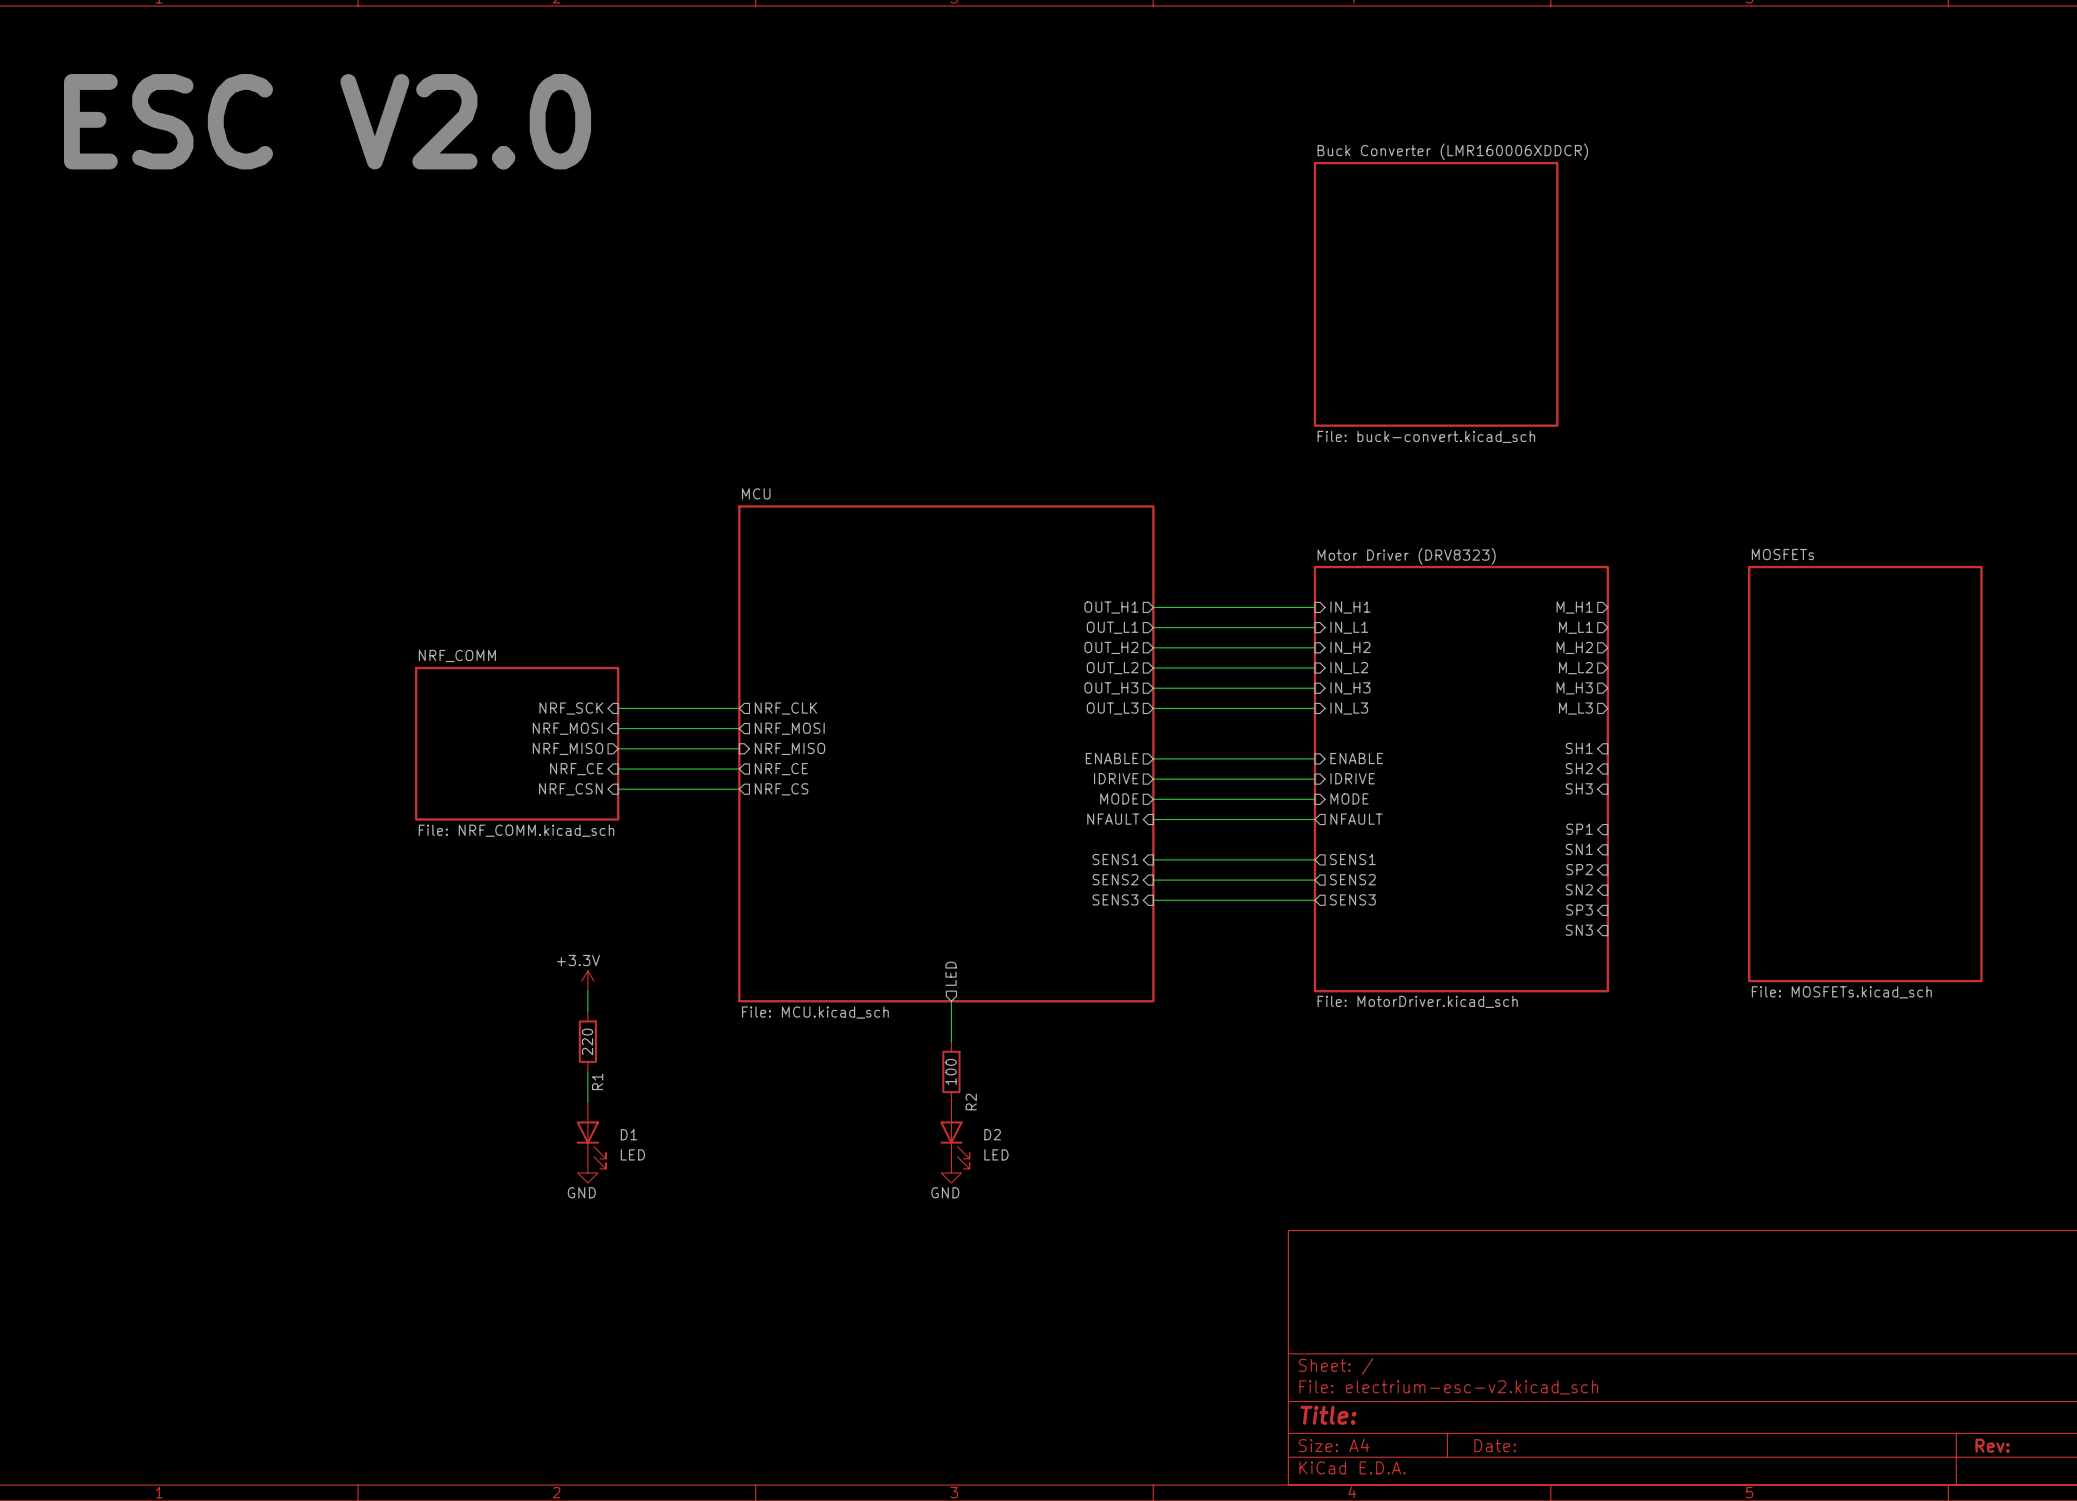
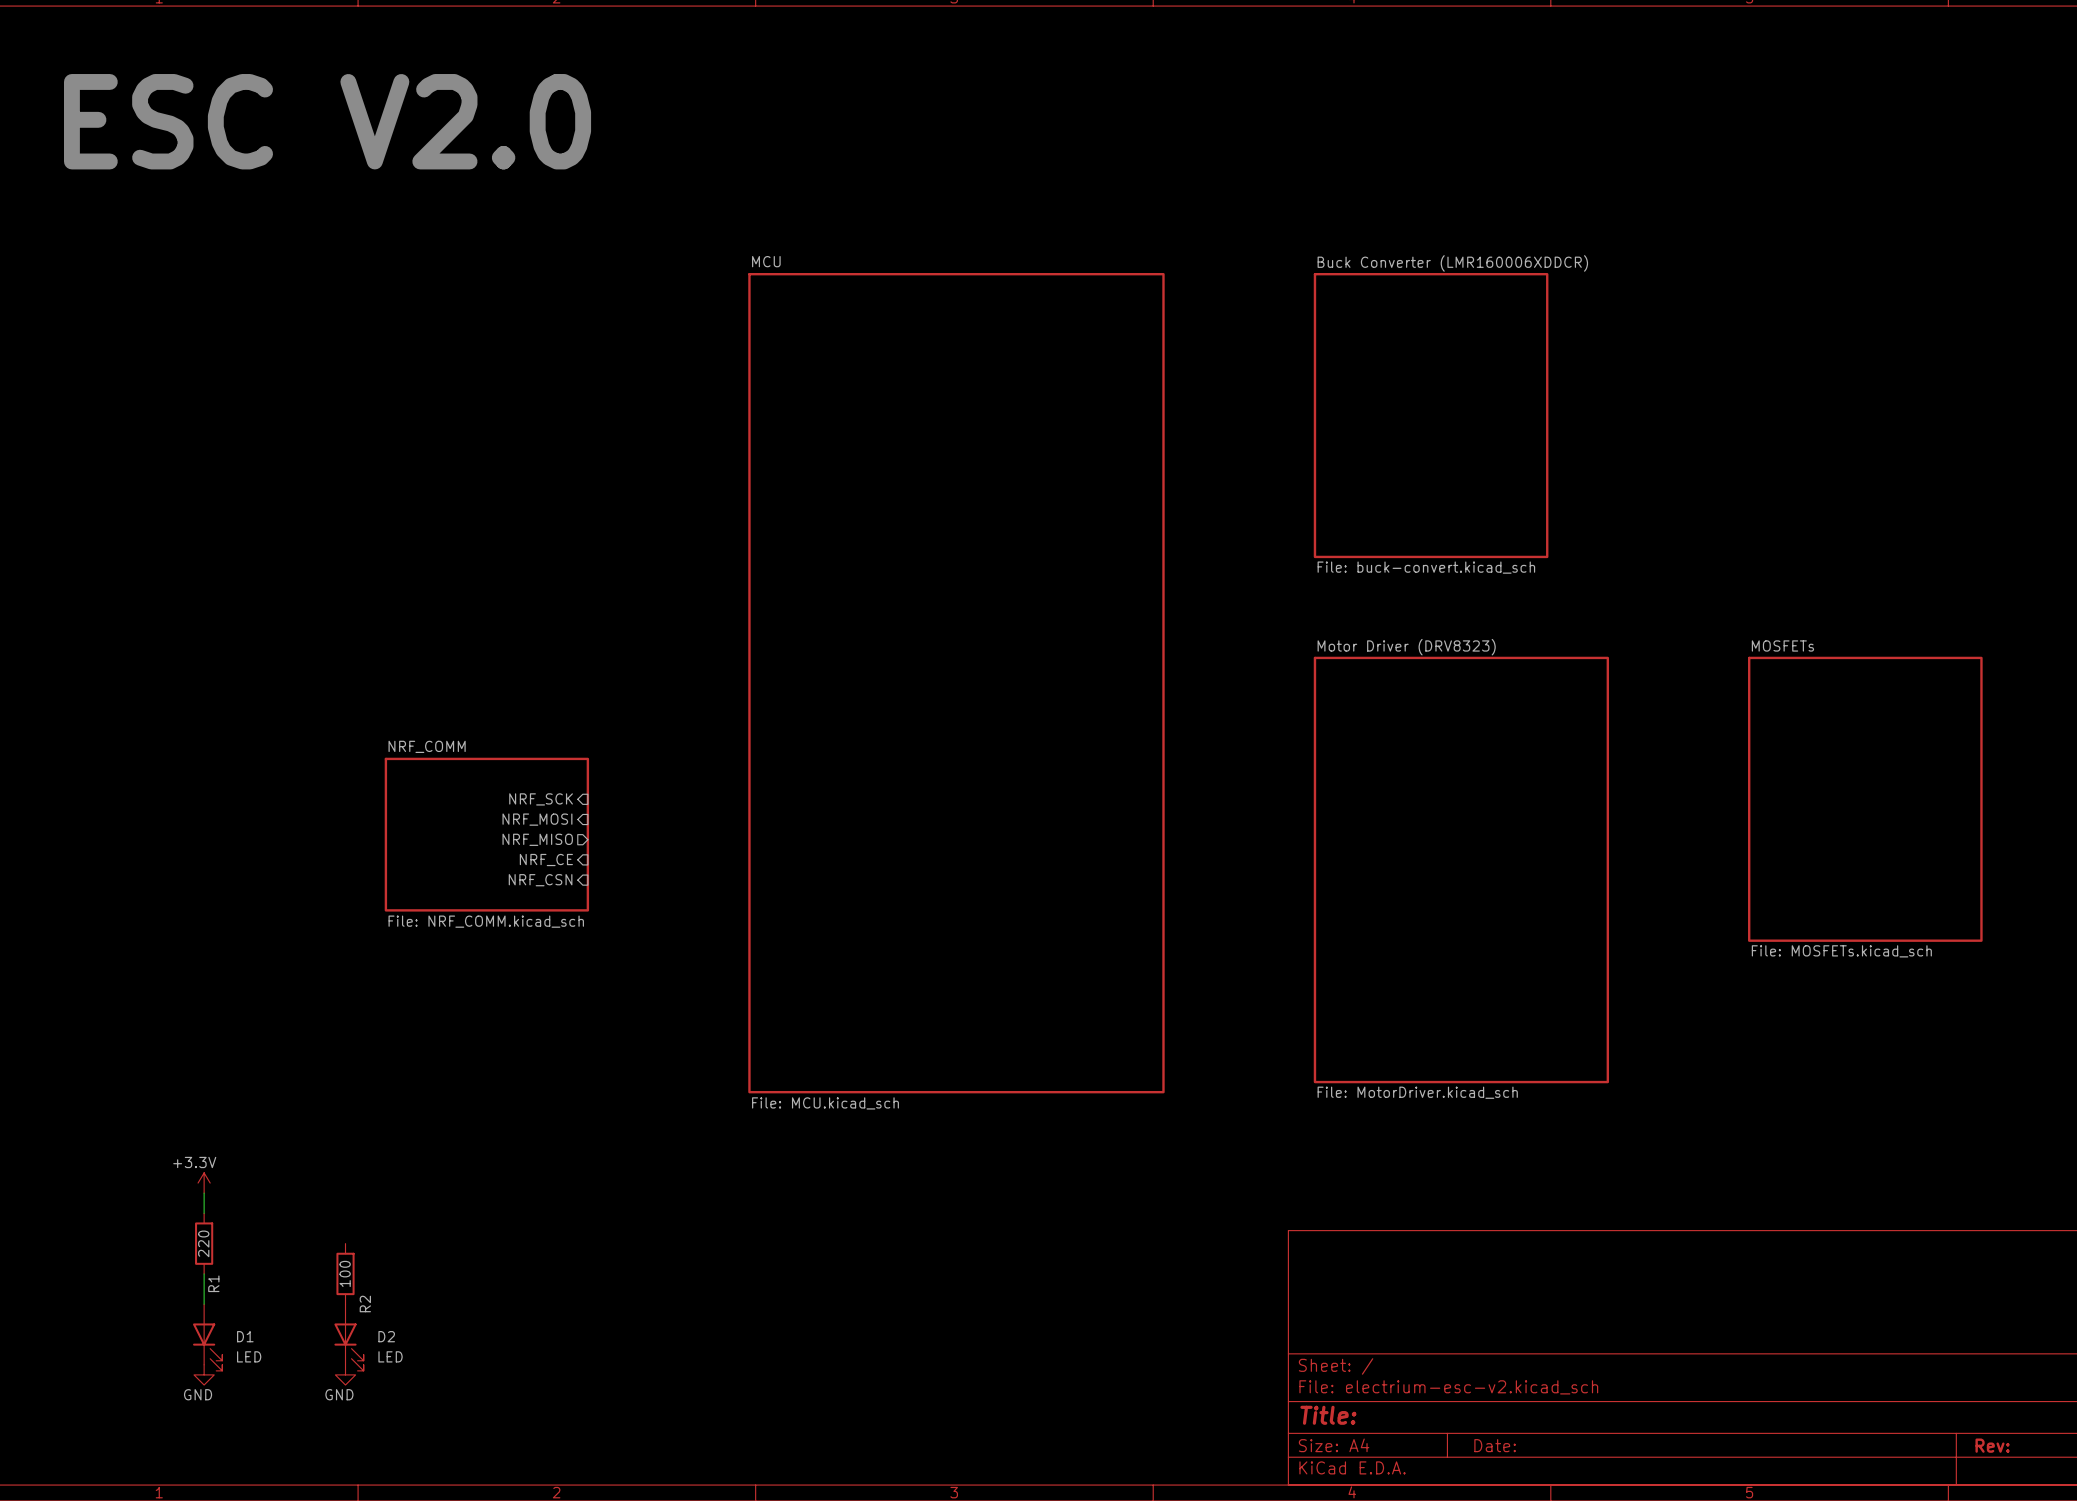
sheet Buck Converter (LMR160006XDDCR) shape: [1313, 161, 1559, 427] -> [1313, 272, 1549, 559]
sheet pin: OUT_H1 (1111, 607) -> none
wire: (1153, 607) (1314, 607) -> none
sheet pin: IN_H1 (1350, 607) -> none
sheet pin: M_H1 (1574, 607) -> none
sheet pin: OUT_L1 (1112, 627) -> none
wire: (1153, 627) (1314, 627) -> none
sheet pin: IN_L1 (1349, 627) -> none
sheet pin: M_L1 (1575, 627) -> none
sheet pin: OUT_H2 (1111, 647) -> none
wire: (1153, 647) (1314, 647) -> none
sheet pin: IN_H2 (1350, 647) -> none
sheet pin: M_H2 (1574, 647) -> none
sheet pin: OUT_L2 (1112, 668) -> none
wire: (1153, 668) (1314, 668) -> none
sheet pin: IN_L2 (1349, 668) -> none
sheet pin: M_L2 (1575, 668) -> none
sheet MCU: none -> File: MCU.kicad_sch (956, 683)
sheet pin: OUT_H3 (1111, 688) -> none
wire: (1153, 688) (1314, 688) -> none
sheet pin: IN_H3 (1350, 688) -> none
sheet pin: M_H3 (1574, 688) -> none
sheet pin position: NRF_SCK (571, 708) -> NRF_SCK (541, 799)
wire: (618, 708) (739, 708) -> none
sheet pin: NRF_CLK (785, 708) -> none
sheet pin: OUT_L3 (1112, 708) -> none
wire: (1153, 708) (1314, 708) -> none
sheet pin: IN_L3 (1349, 708) -> none
sheet pin: M_L3 (1575, 708) -> none
sheet pin position: NRF_MOSI (567, 728) -> NRF_MOSI (537, 819)
wire: (618, 728) (739, 728) -> none
sheet pin: NRF_MOSI (789, 728) -> none
sheet NRF_COMM position: (517, 743) -> (486, 834)
sheet pin position: NRF_MISO (567, 748) -> NRF_MISO (537, 839)
wire: (618, 748) (739, 748) -> none
sheet pin: NRF_MISO (790, 748) -> none
sheet pin: SH1 (1579, 748) -> none
sheet MCU: File: MCU.kicad_sch (946, 753) -> none
sheet pin: ENABLE (1112, 758) -> none
wire: (1153, 758) (1314, 758) -> none
sheet pin: ENABLE (1356, 758) -> none
sheet pin: SH2 (1579, 768) -> none
sheet pin position: NRF_CE (576, 769) -> NRF_CE (546, 860)
wire: (618, 769) (739, 769) -> none
sheet pin: NRF_CE (781, 769) -> none
sheet MOSFETs: File: MOSFETs.kicad_sch (1865, 774) -> none
sheet pin: IDRIVE (1116, 778) -> none
sheet pin: IDRIVE (1352, 778) -> none
wire: (1153, 779) (1314, 779) -> none
sheet Motor Driver (DRV8323) position: (1461, 779) -> (1461, 869)
sheet pin: SH3 (1579, 788) -> none
sheet pin position: NRF_CSN (570, 789) -> NRF_CSN (540, 880)
wire: (618, 789) (739, 789) -> none
sheet pin: NRF_CS (781, 789) -> none
sheet pin: MODE (1119, 798) -> none
sheet pin: MODE (1349, 798) -> none
wire: (1153, 799) (1314, 799) -> none
sheet MOSFETs: none -> File: MOSFETs.kicad_sch (1865, 799)
sheet pin: NFAULT (1113, 819) -> none
wire: (1153, 819) (1314, 819) -> none
sheet pin: NFAULT (1356, 819) -> none
sheet pin: SP1 (1579, 829) -> none
sheet pin: SN1 (1579, 849) -> none
sheet pin: SENS1 (1115, 859) -> none
wire: (1153, 859) (1314, 859) -> none
sheet pin: SENS1 (1352, 859) -> none
sheet pin: SP2 (1579, 869) -> none
sheet pin: SENS2 (1115, 879) -> none
sheet pin: SENS2 (1352, 879) -> none
wire: (1153, 880) (1314, 880) -> none
sheet pin: SN2 (1579, 889) -> none
sheet pin: SENS3 (1115, 899) -> none
sheet pin: SENS3 (1352, 899) -> none
wire: (1153, 900) (1314, 900) -> none
sheet pin: SP3 (1579, 910) -> none
sheet pin: SN3 (1579, 930) -> none
sheet pin: LED (951, 973) -> none
power symbol: +3.3V (587, 981) -> none
wire: (587, 991) (587, 1011) -> none
wire: (951, 1001) (951, 1041) -> none
R1 position: (587, 1041) -> (204, 1243)
wire: (587, 1071) (587, 1102) -> none
R2 position: (951, 1071) -> (345, 1273)
D1 position: (591, 1135) -> (207, 1337)
D2 position: (954, 1135) -> (349, 1337)
power symbol: GND (587, 1172) -> none
power symbol: GND (951, 1172) -> none
power symbol: none -> +3.3V (204, 1183)
wire: none -> (204, 1193) (204, 1213)
wire: none -> (204, 1273) (204, 1304)
power symbol: none -> GND (204, 1374)
power symbol: none -> GND (345, 1374)

